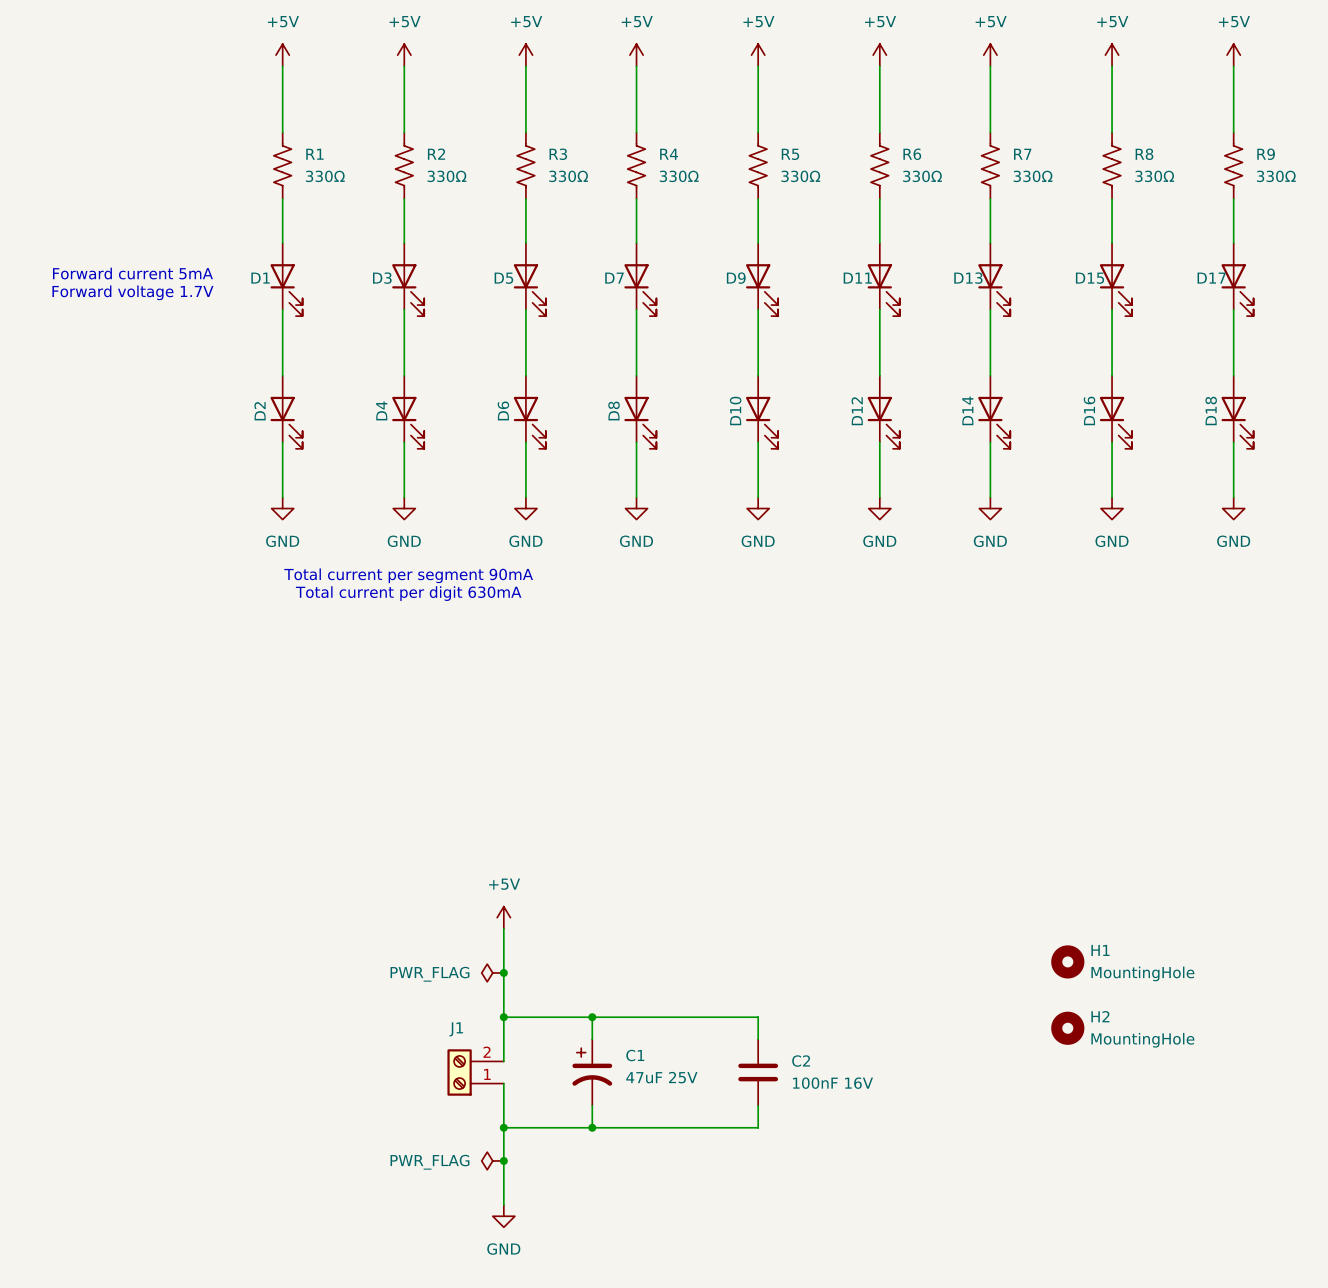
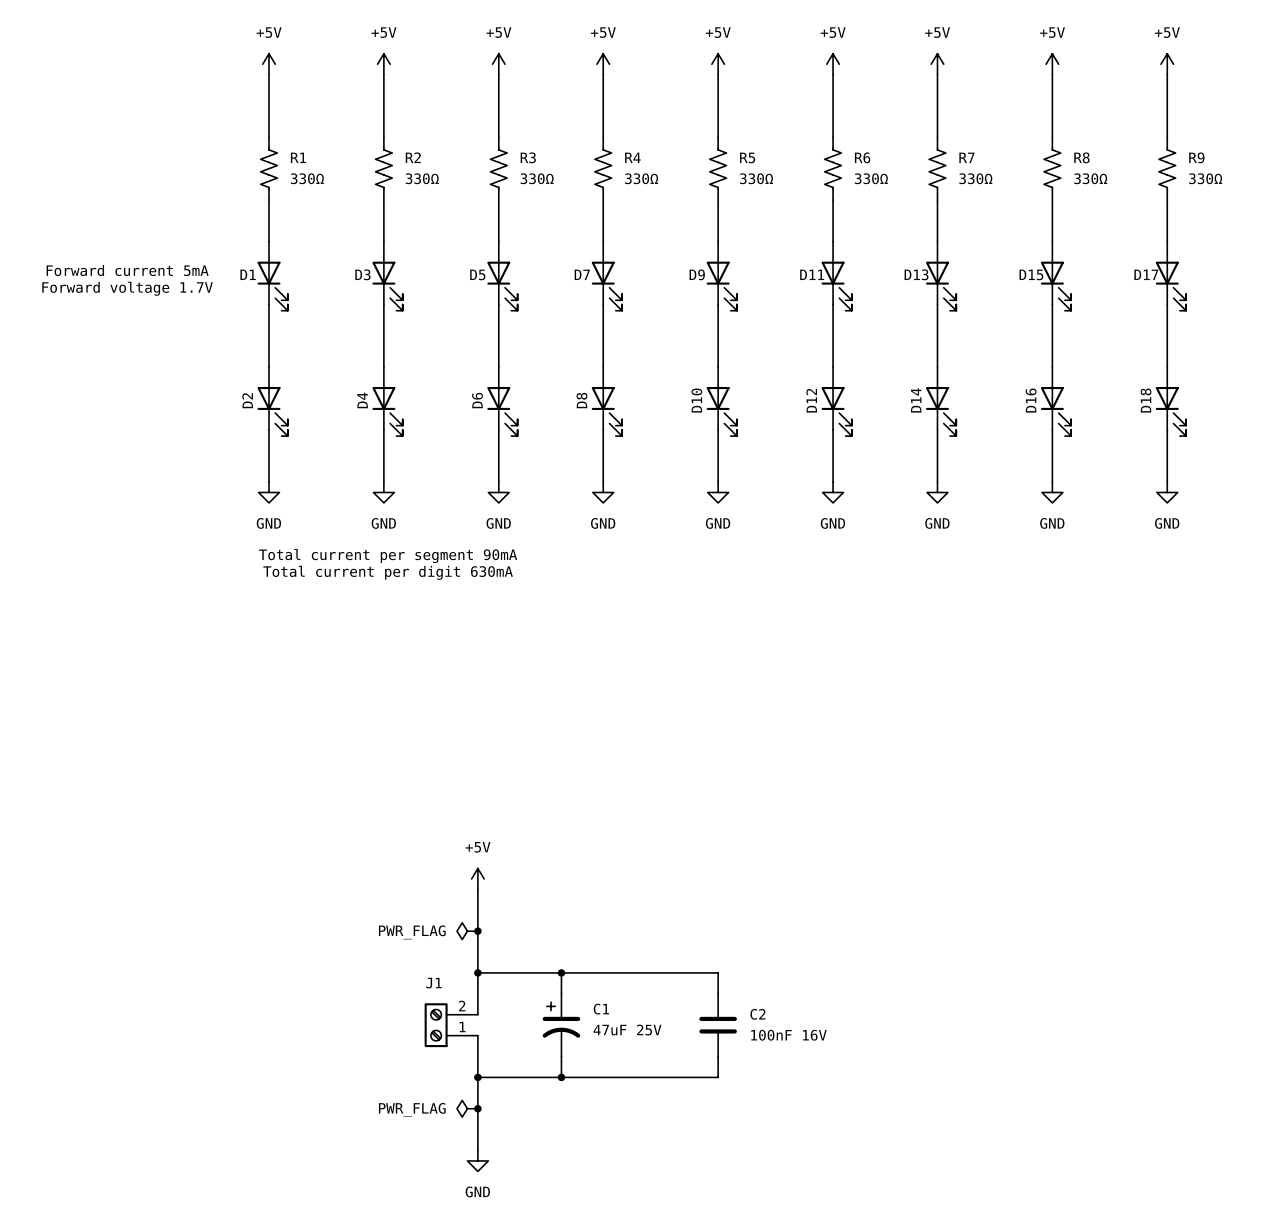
H1: MountingHole (1067, 961) -> none
H2: MountingHole (1067, 1028) -> none

